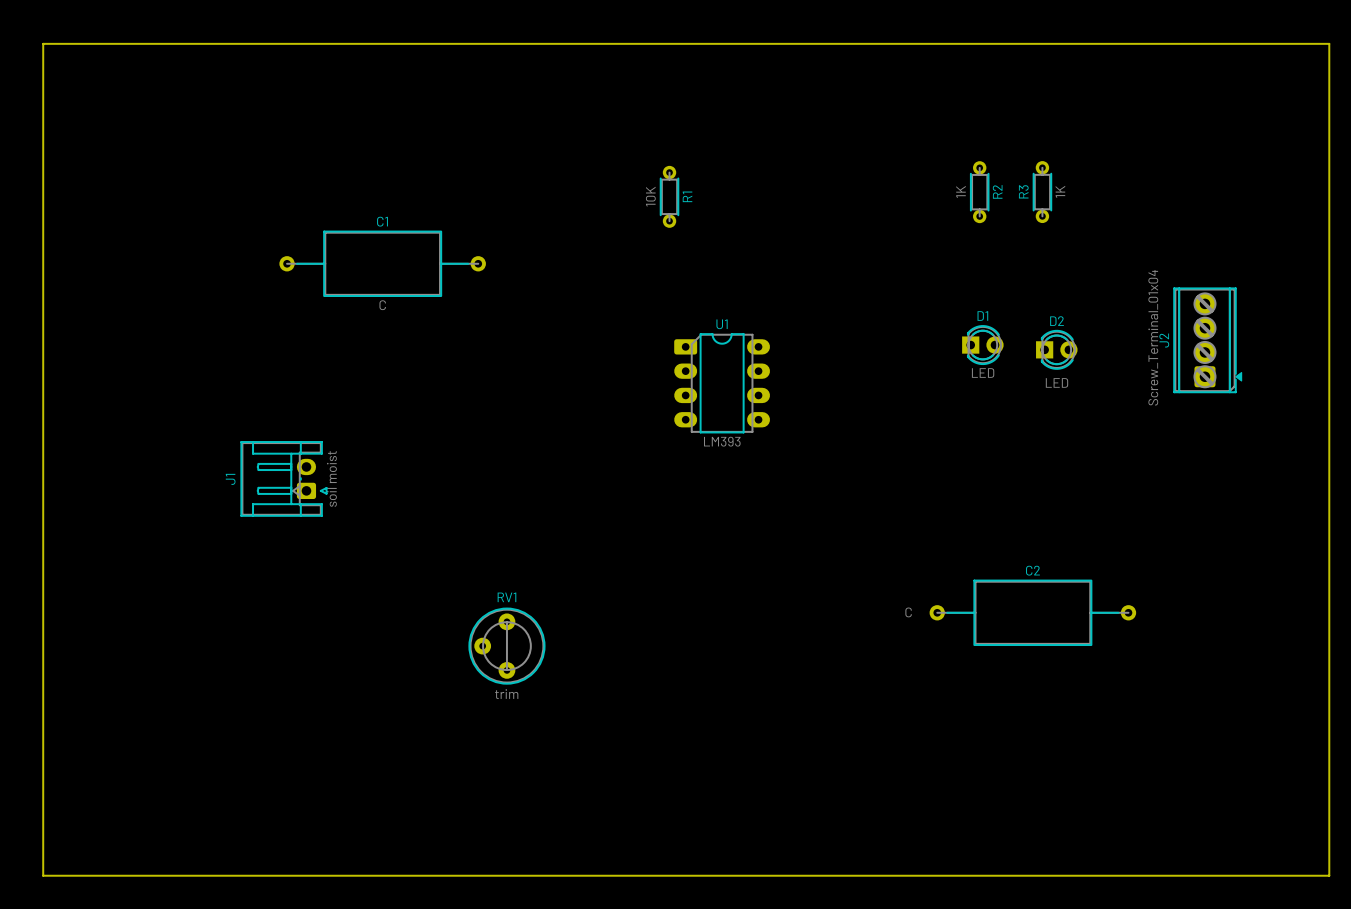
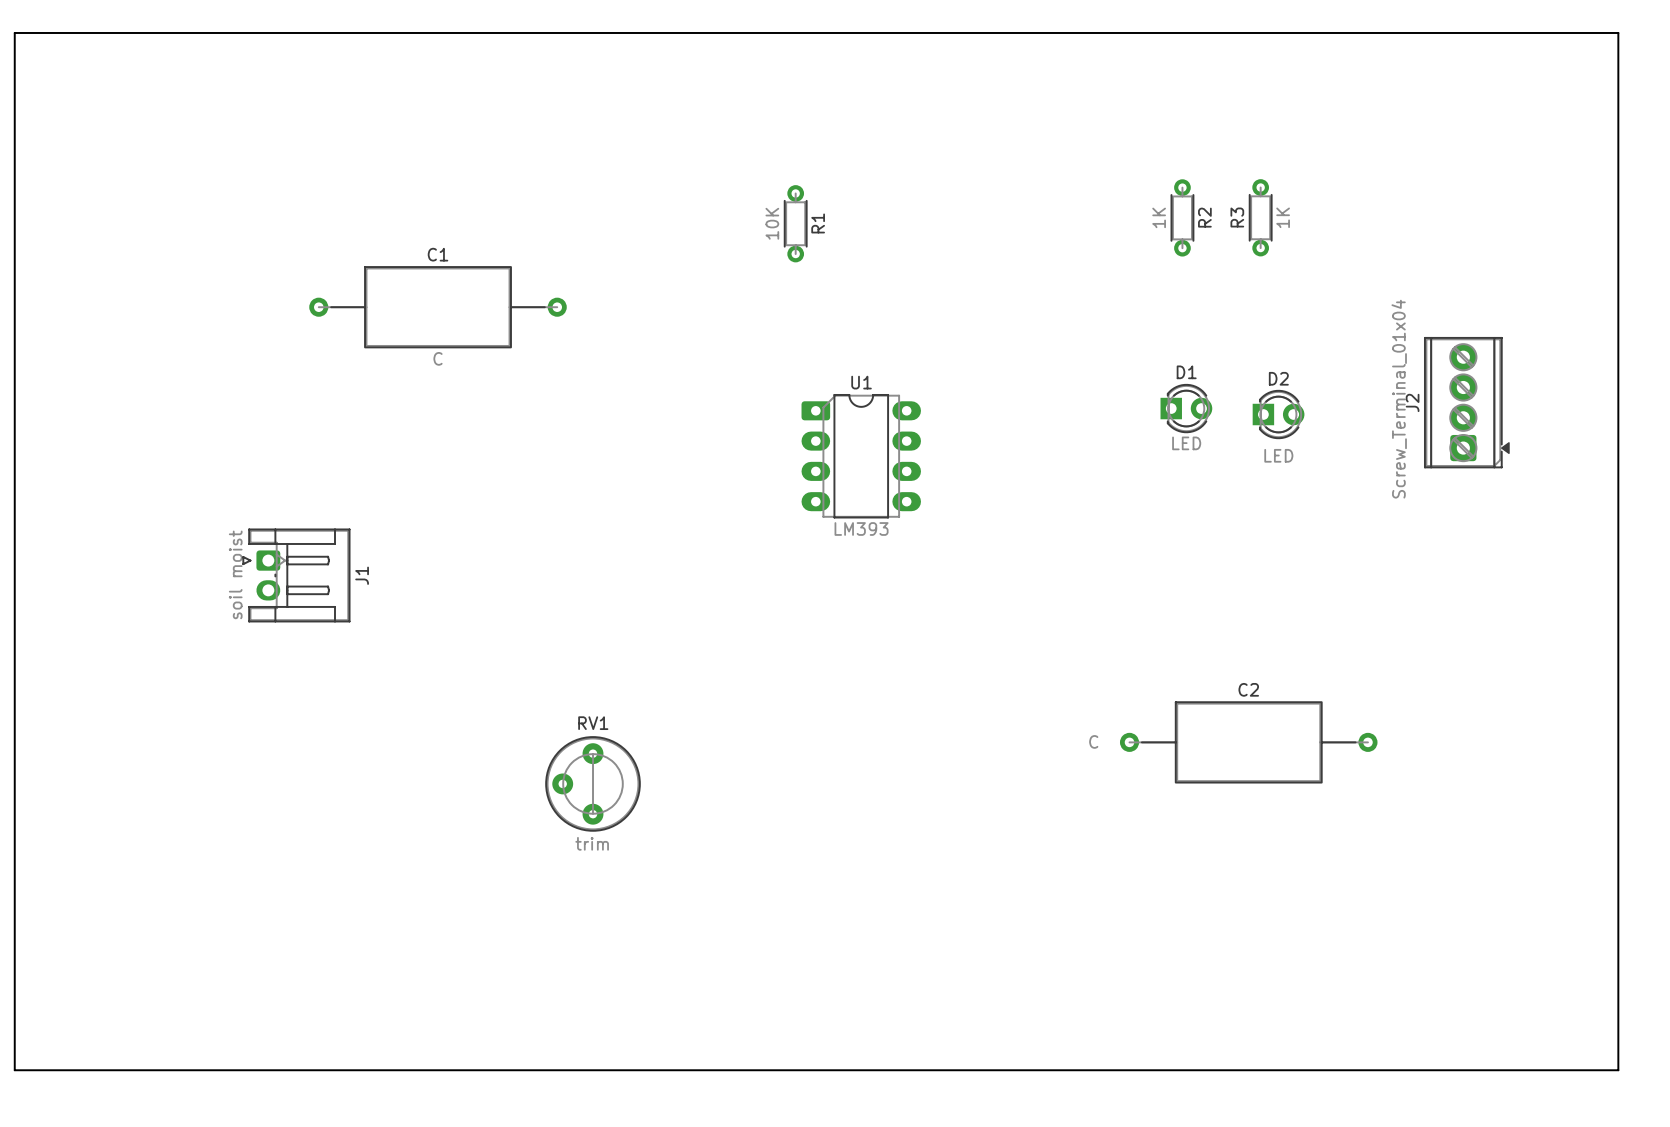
J1 rotation: 0° (283, 478) -> 180° (296, 575)

